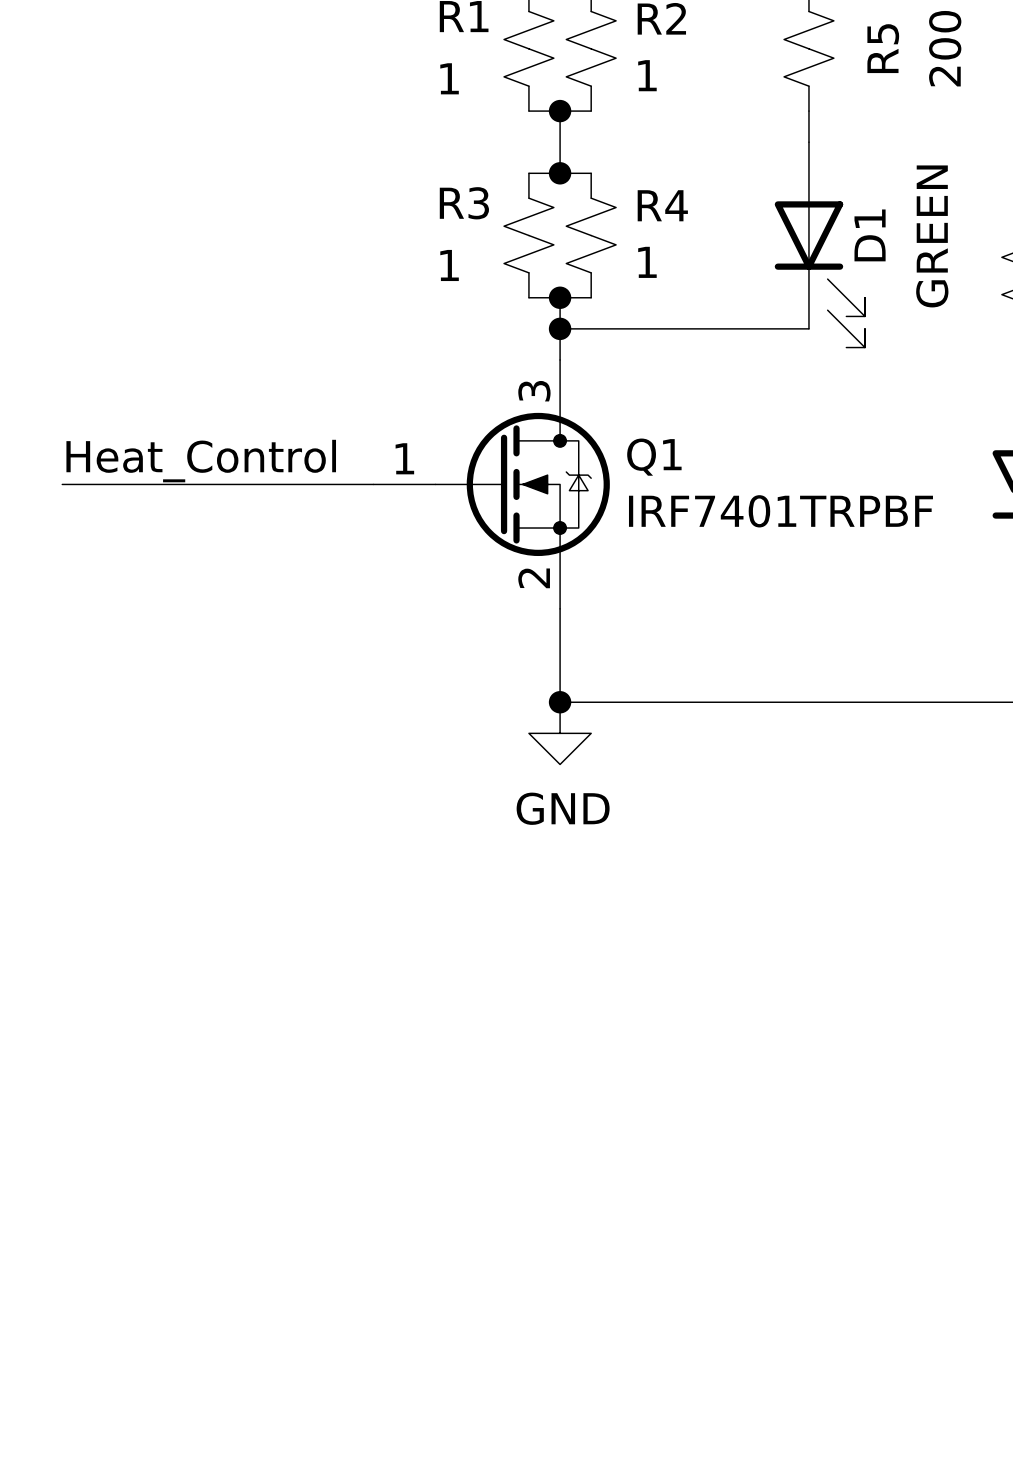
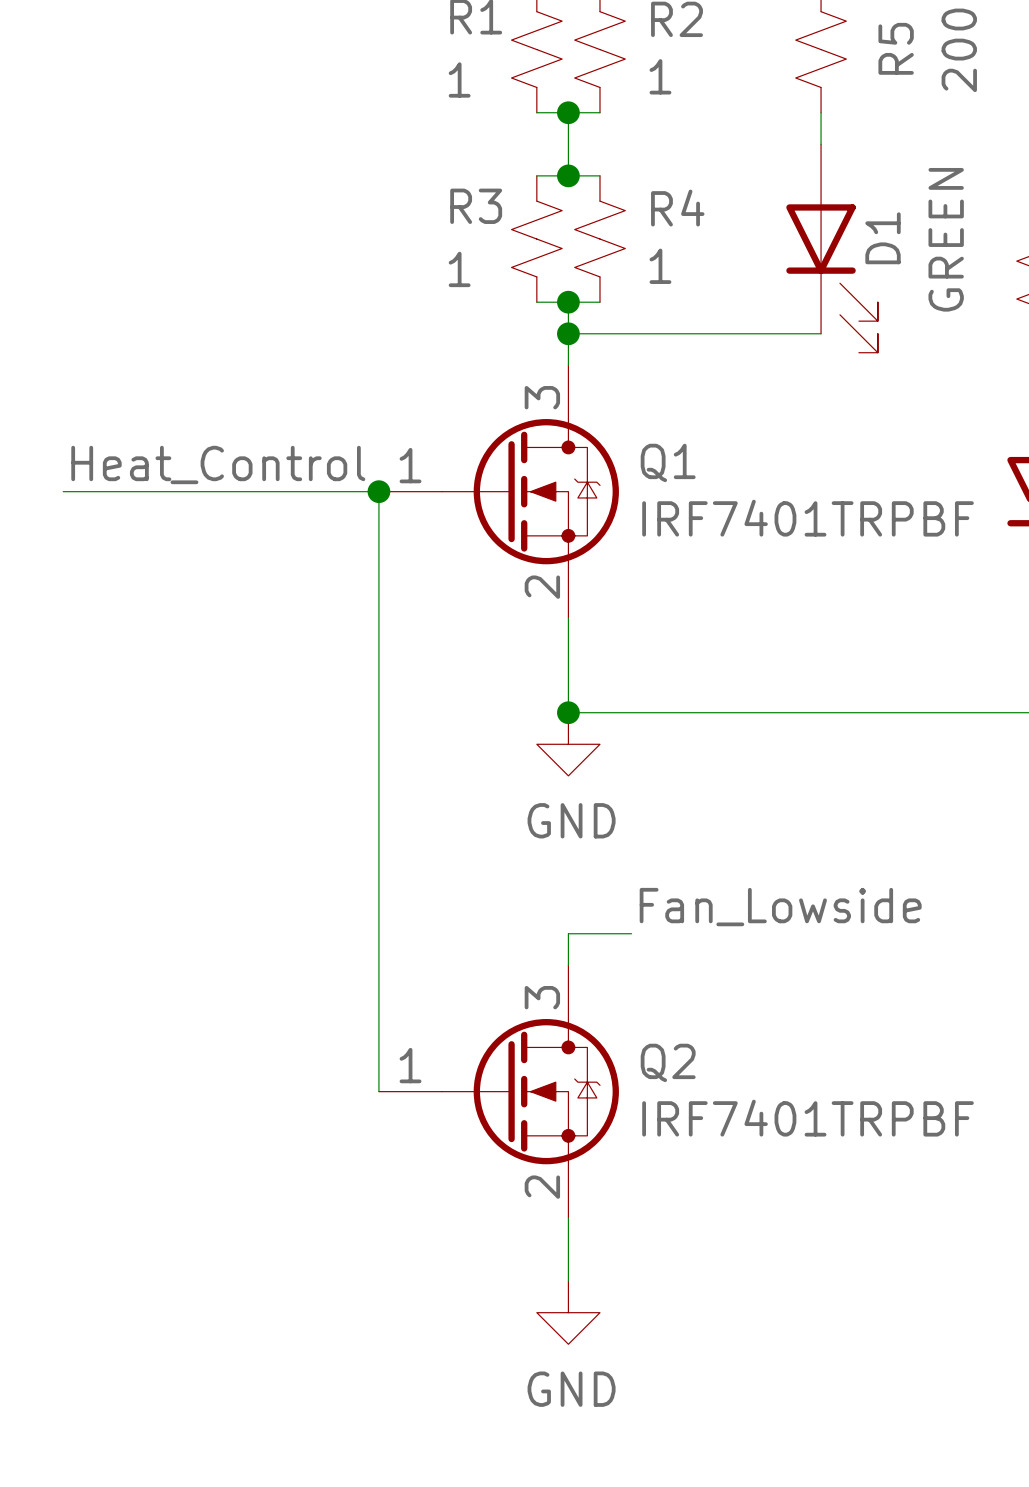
wire: none -> (378, 491) (378, 1091)
junction: none -> (378, 491)
label: none -> Fan_Lowside (780, 907)
wire: none -> (631, 933) (568, 933) (568, 965)
Q2: none -> IRF7401TRPBF (498, 1091)
wire: none -> (568, 1217) (568, 1281)
power symbol: none -> GND (568, 1312)

